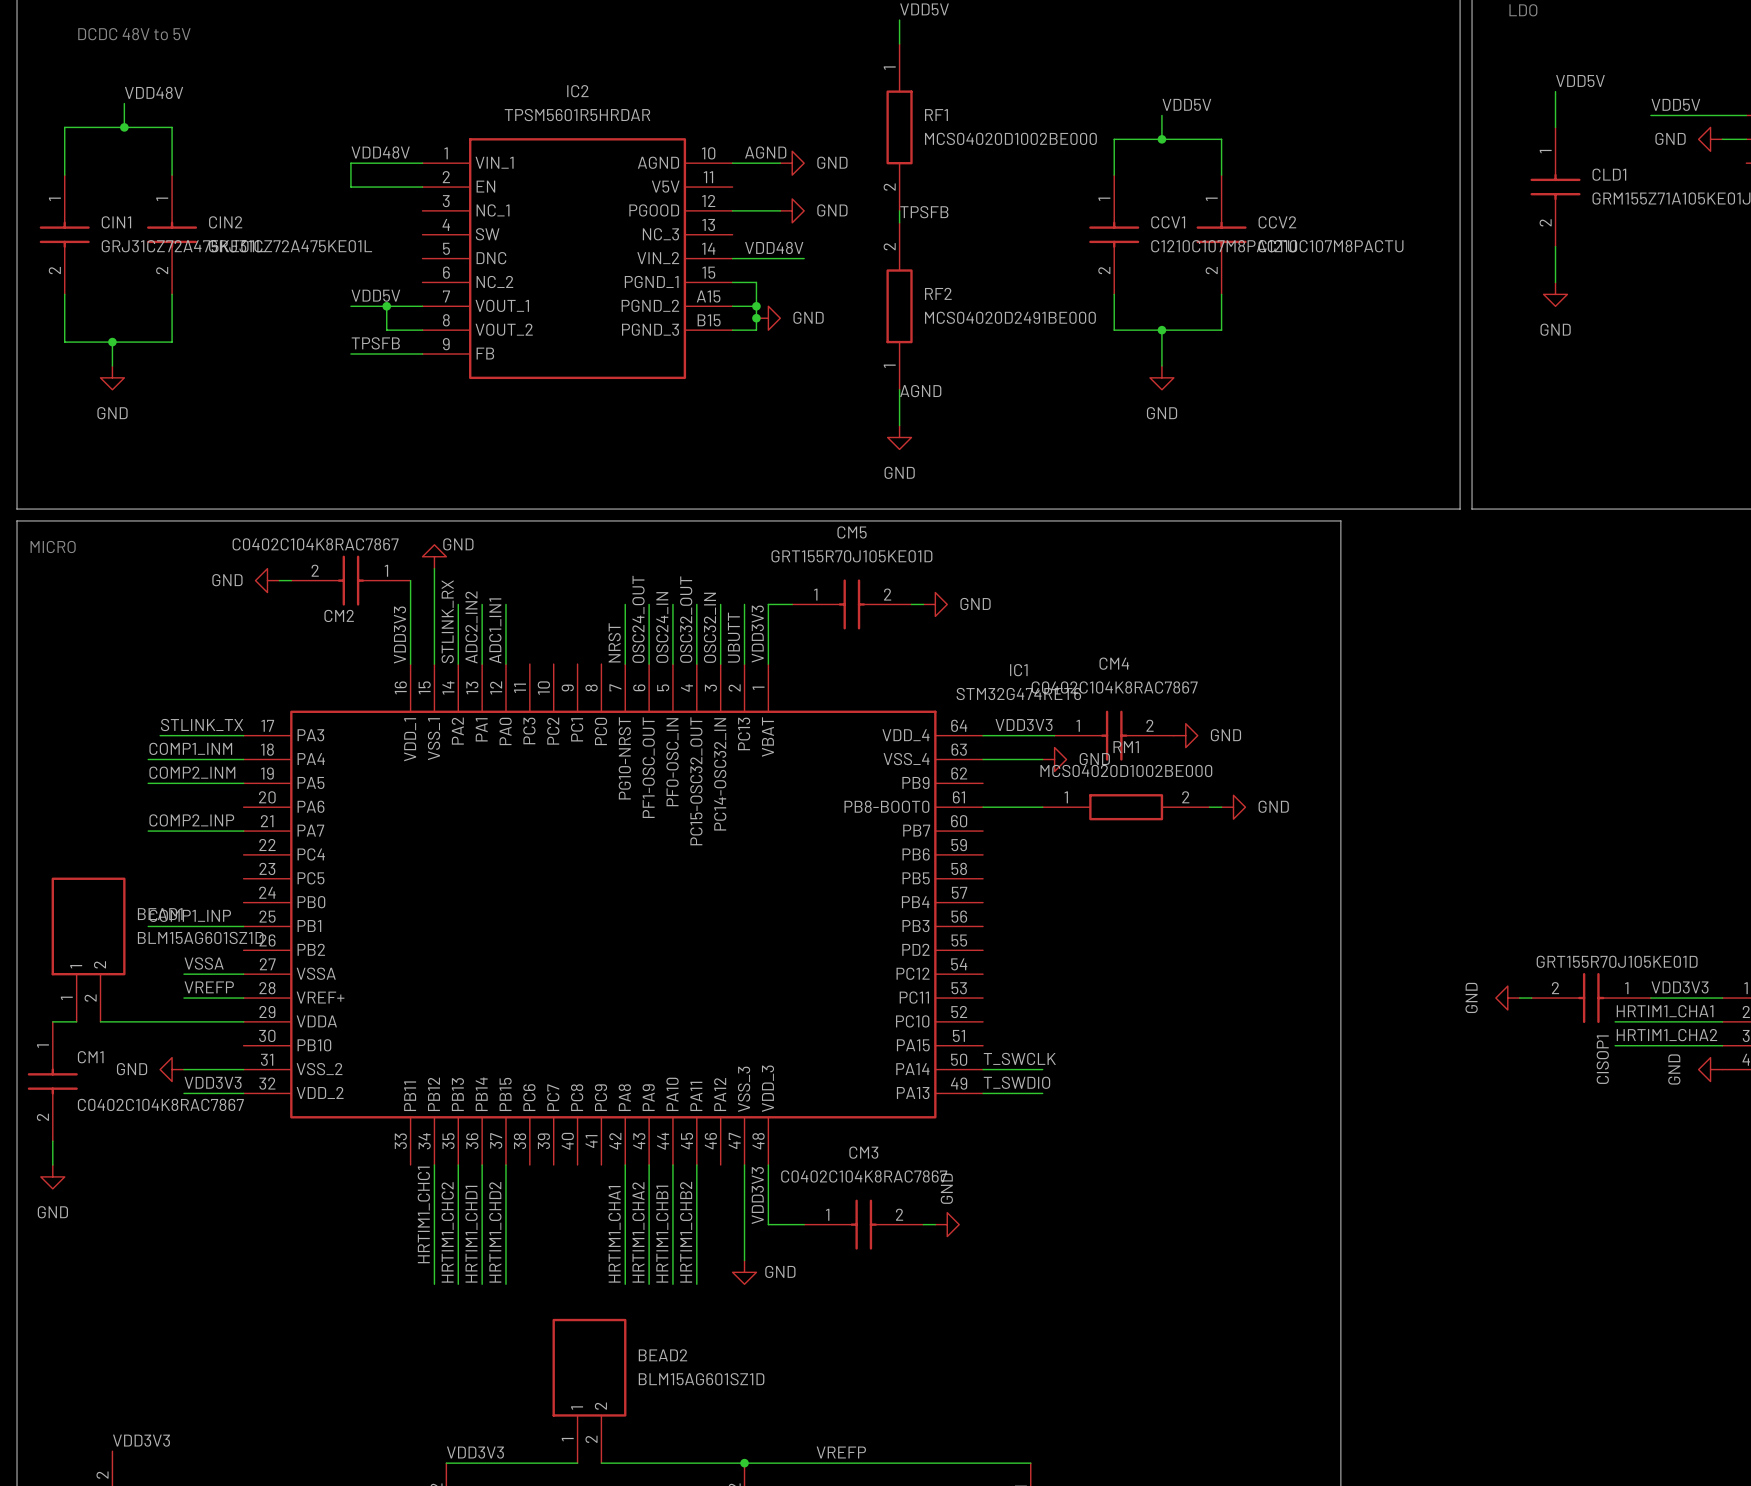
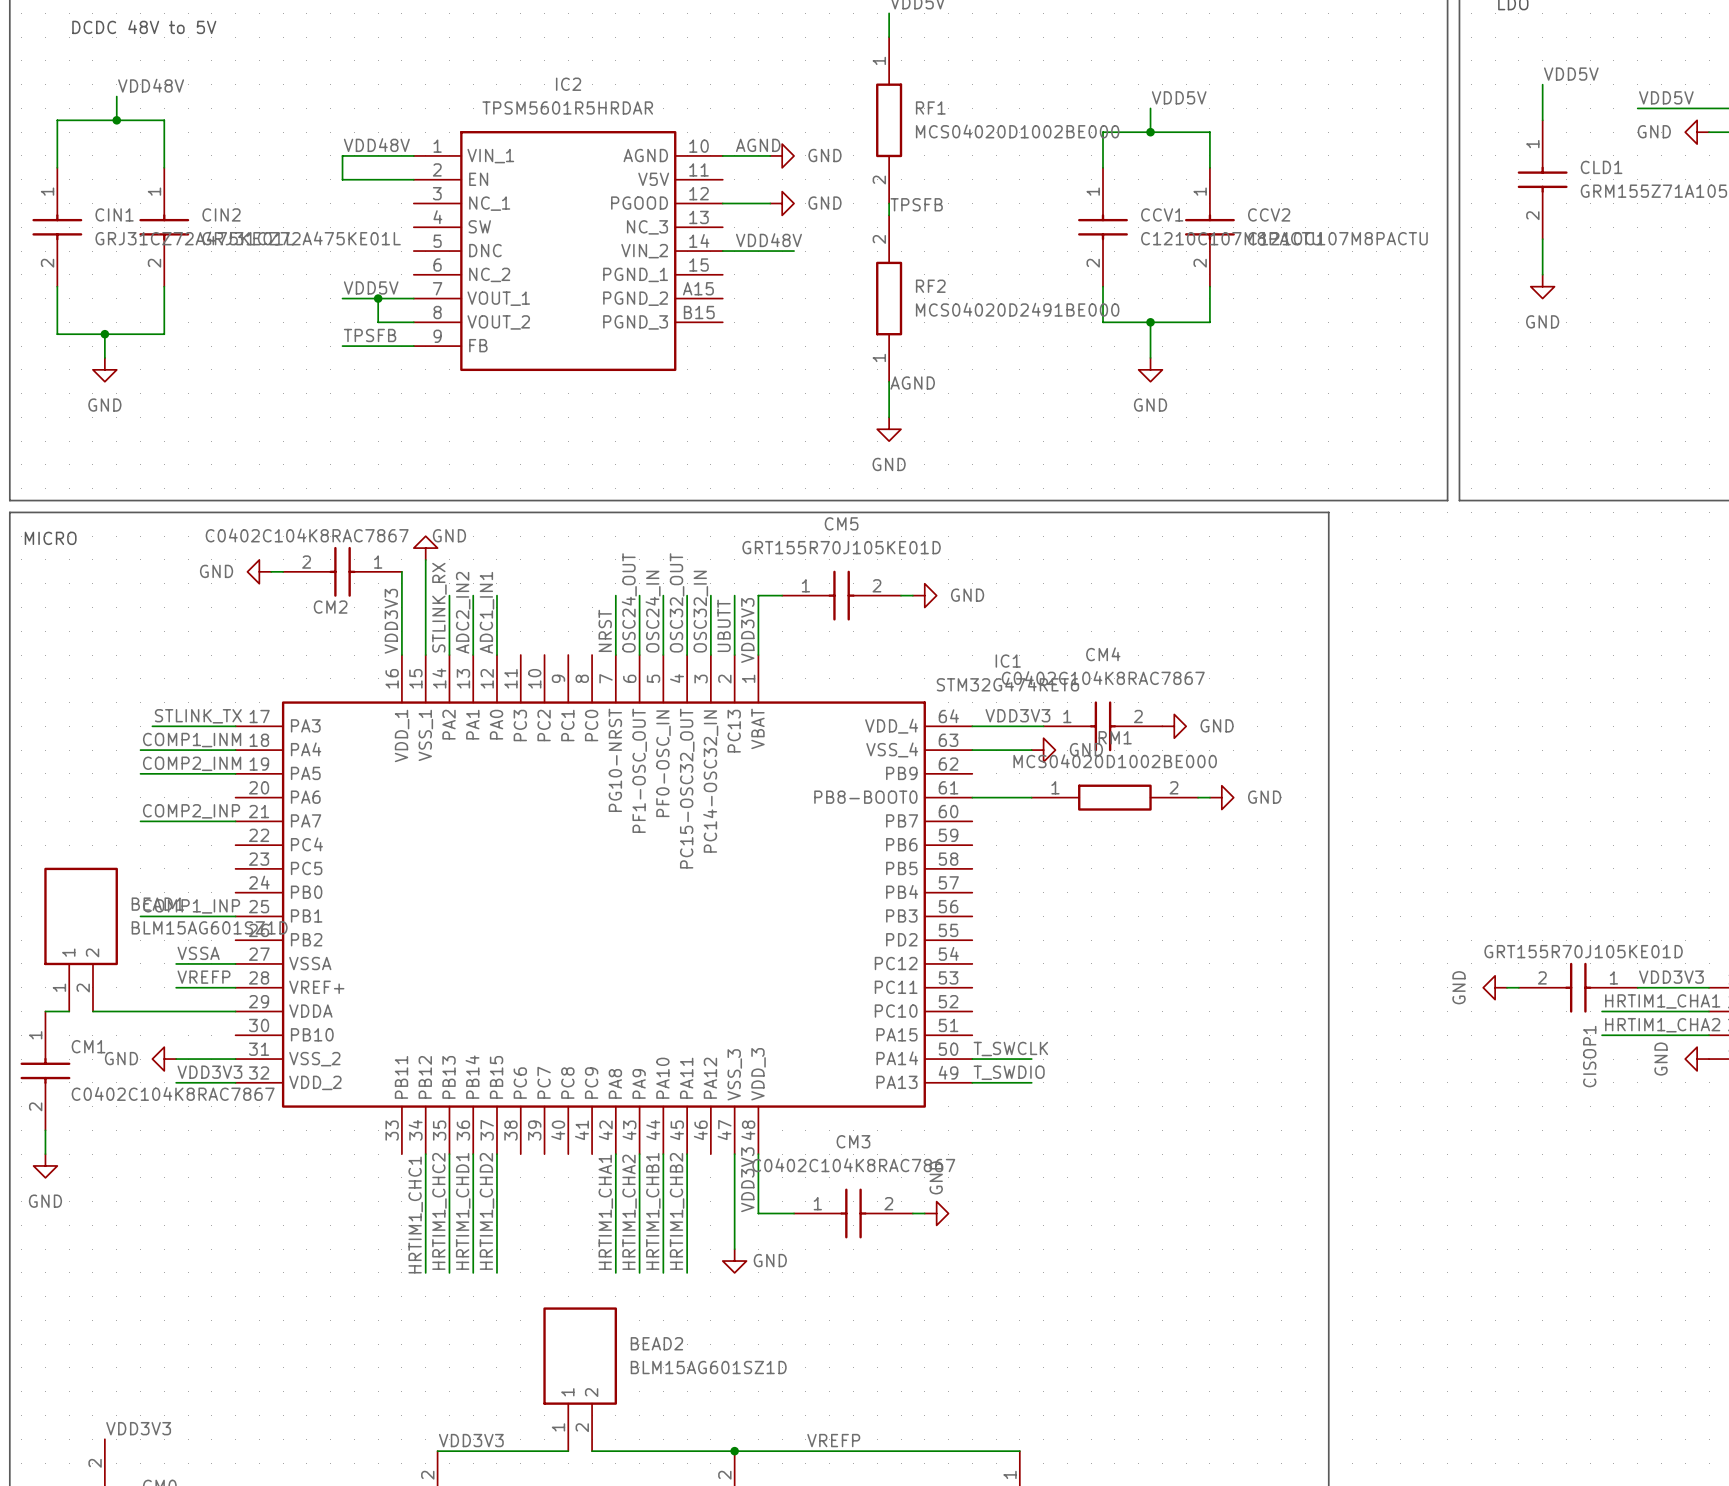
wire: (732, 282) (756, 282) (756, 330) (732, 330) -> none
wire: (732, 306) (756, 306) -> none
junction: (756, 306) -> none
junction: (756, 318) -> none
power symbol: GND (768, 318) -> none

